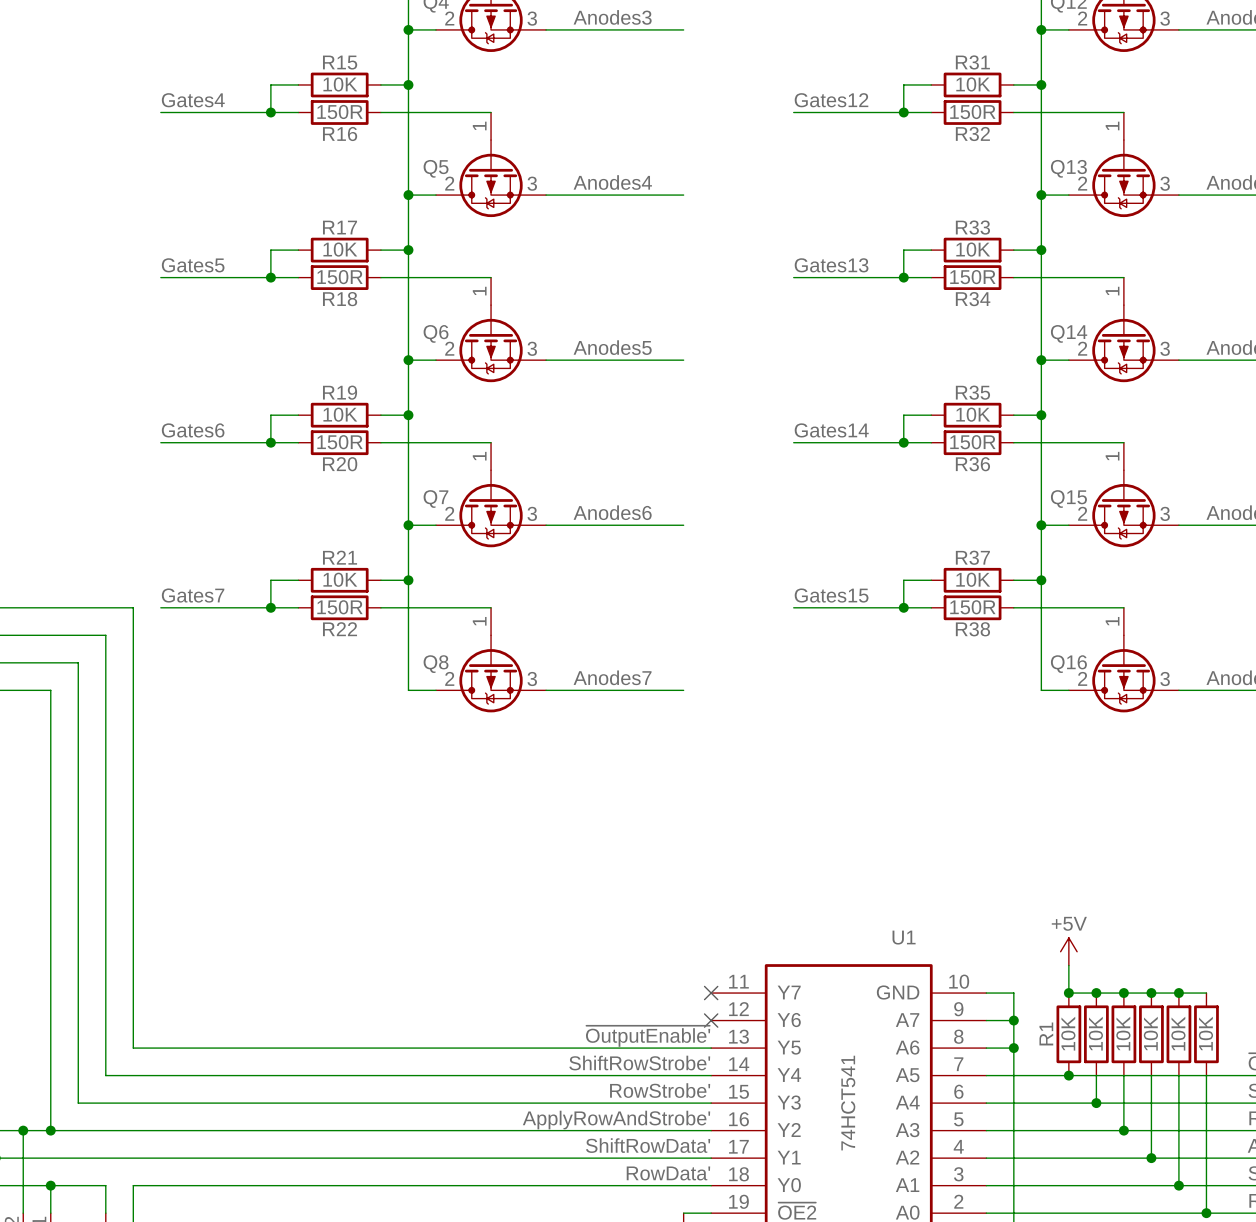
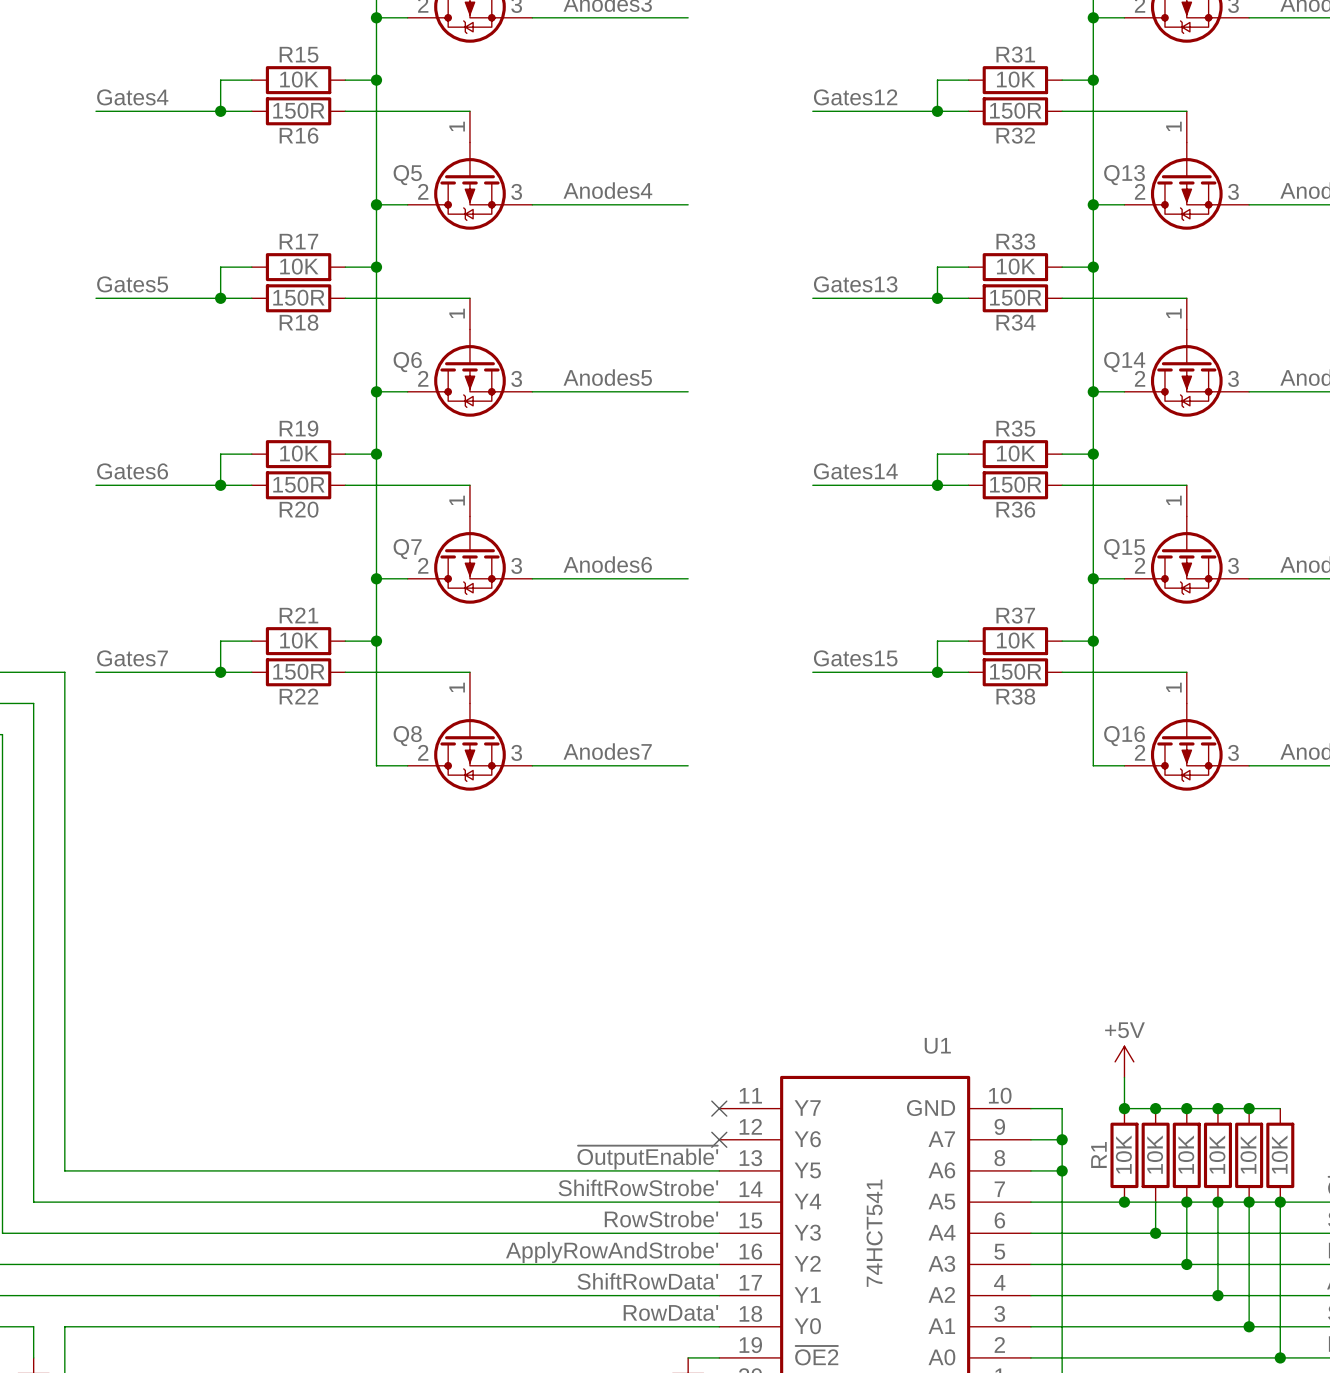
junction: none -> (1186, 1202)
junction: none -> (1217, 1202)
junction: none -> (1249, 1202)
junction: none -> (1280, 1202)

